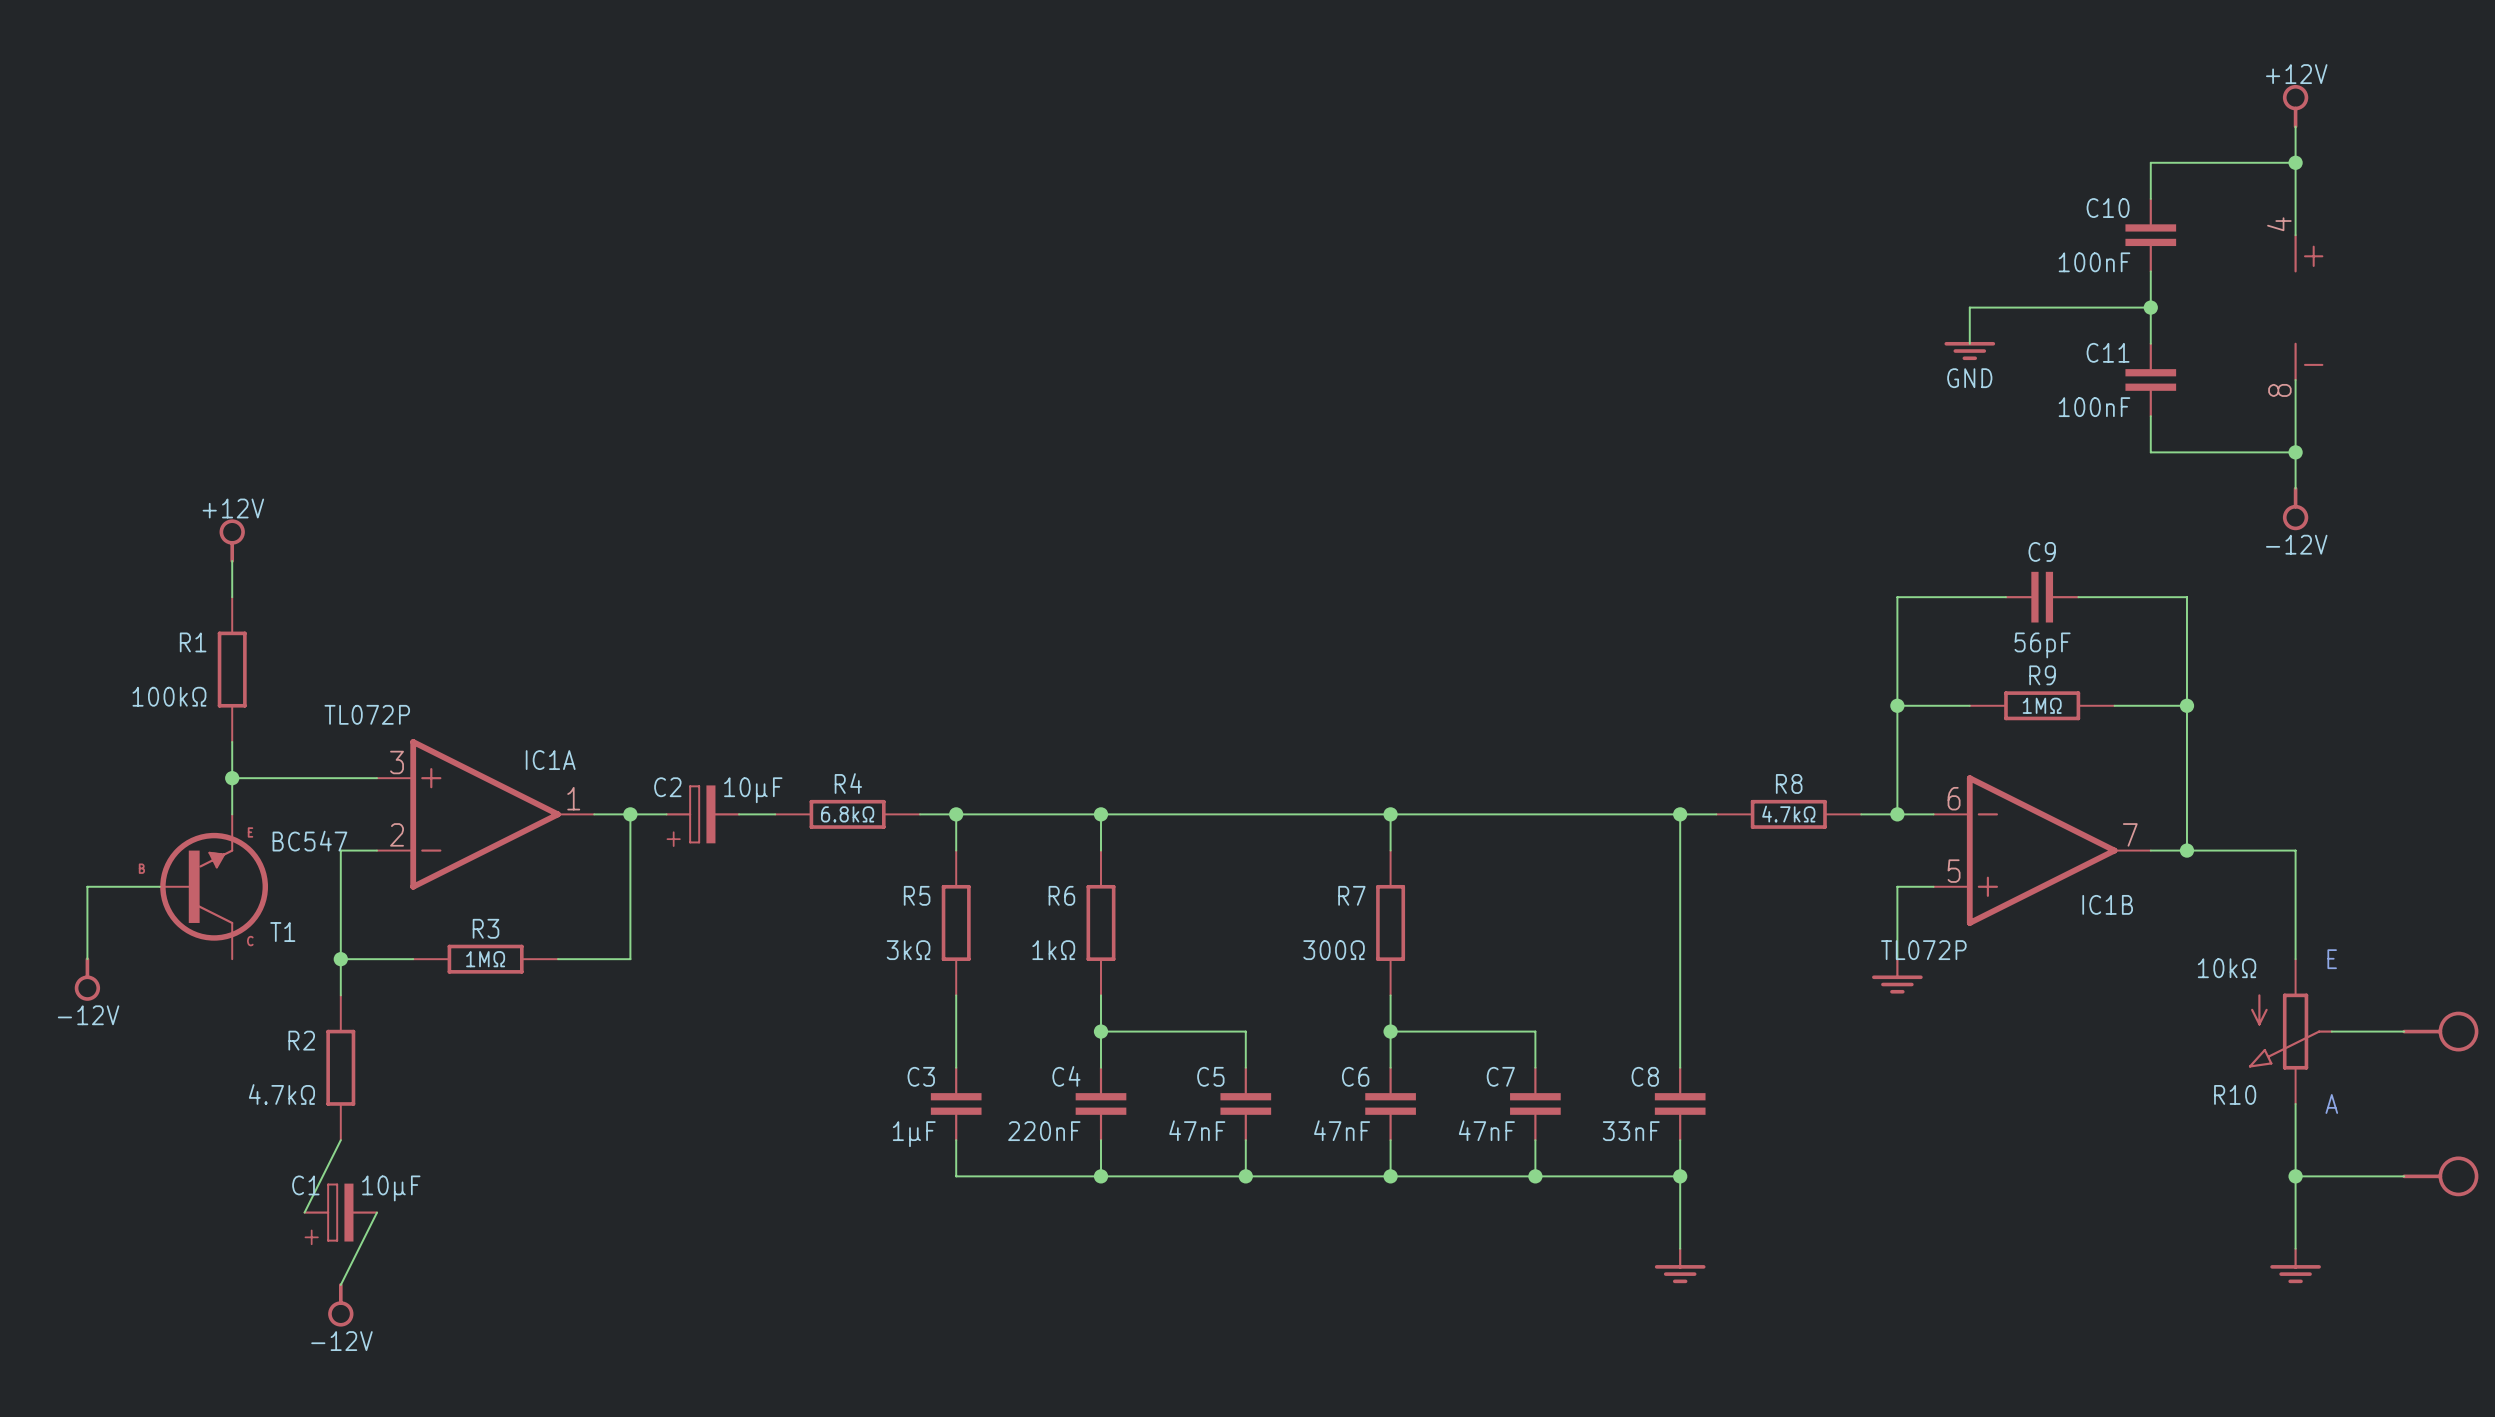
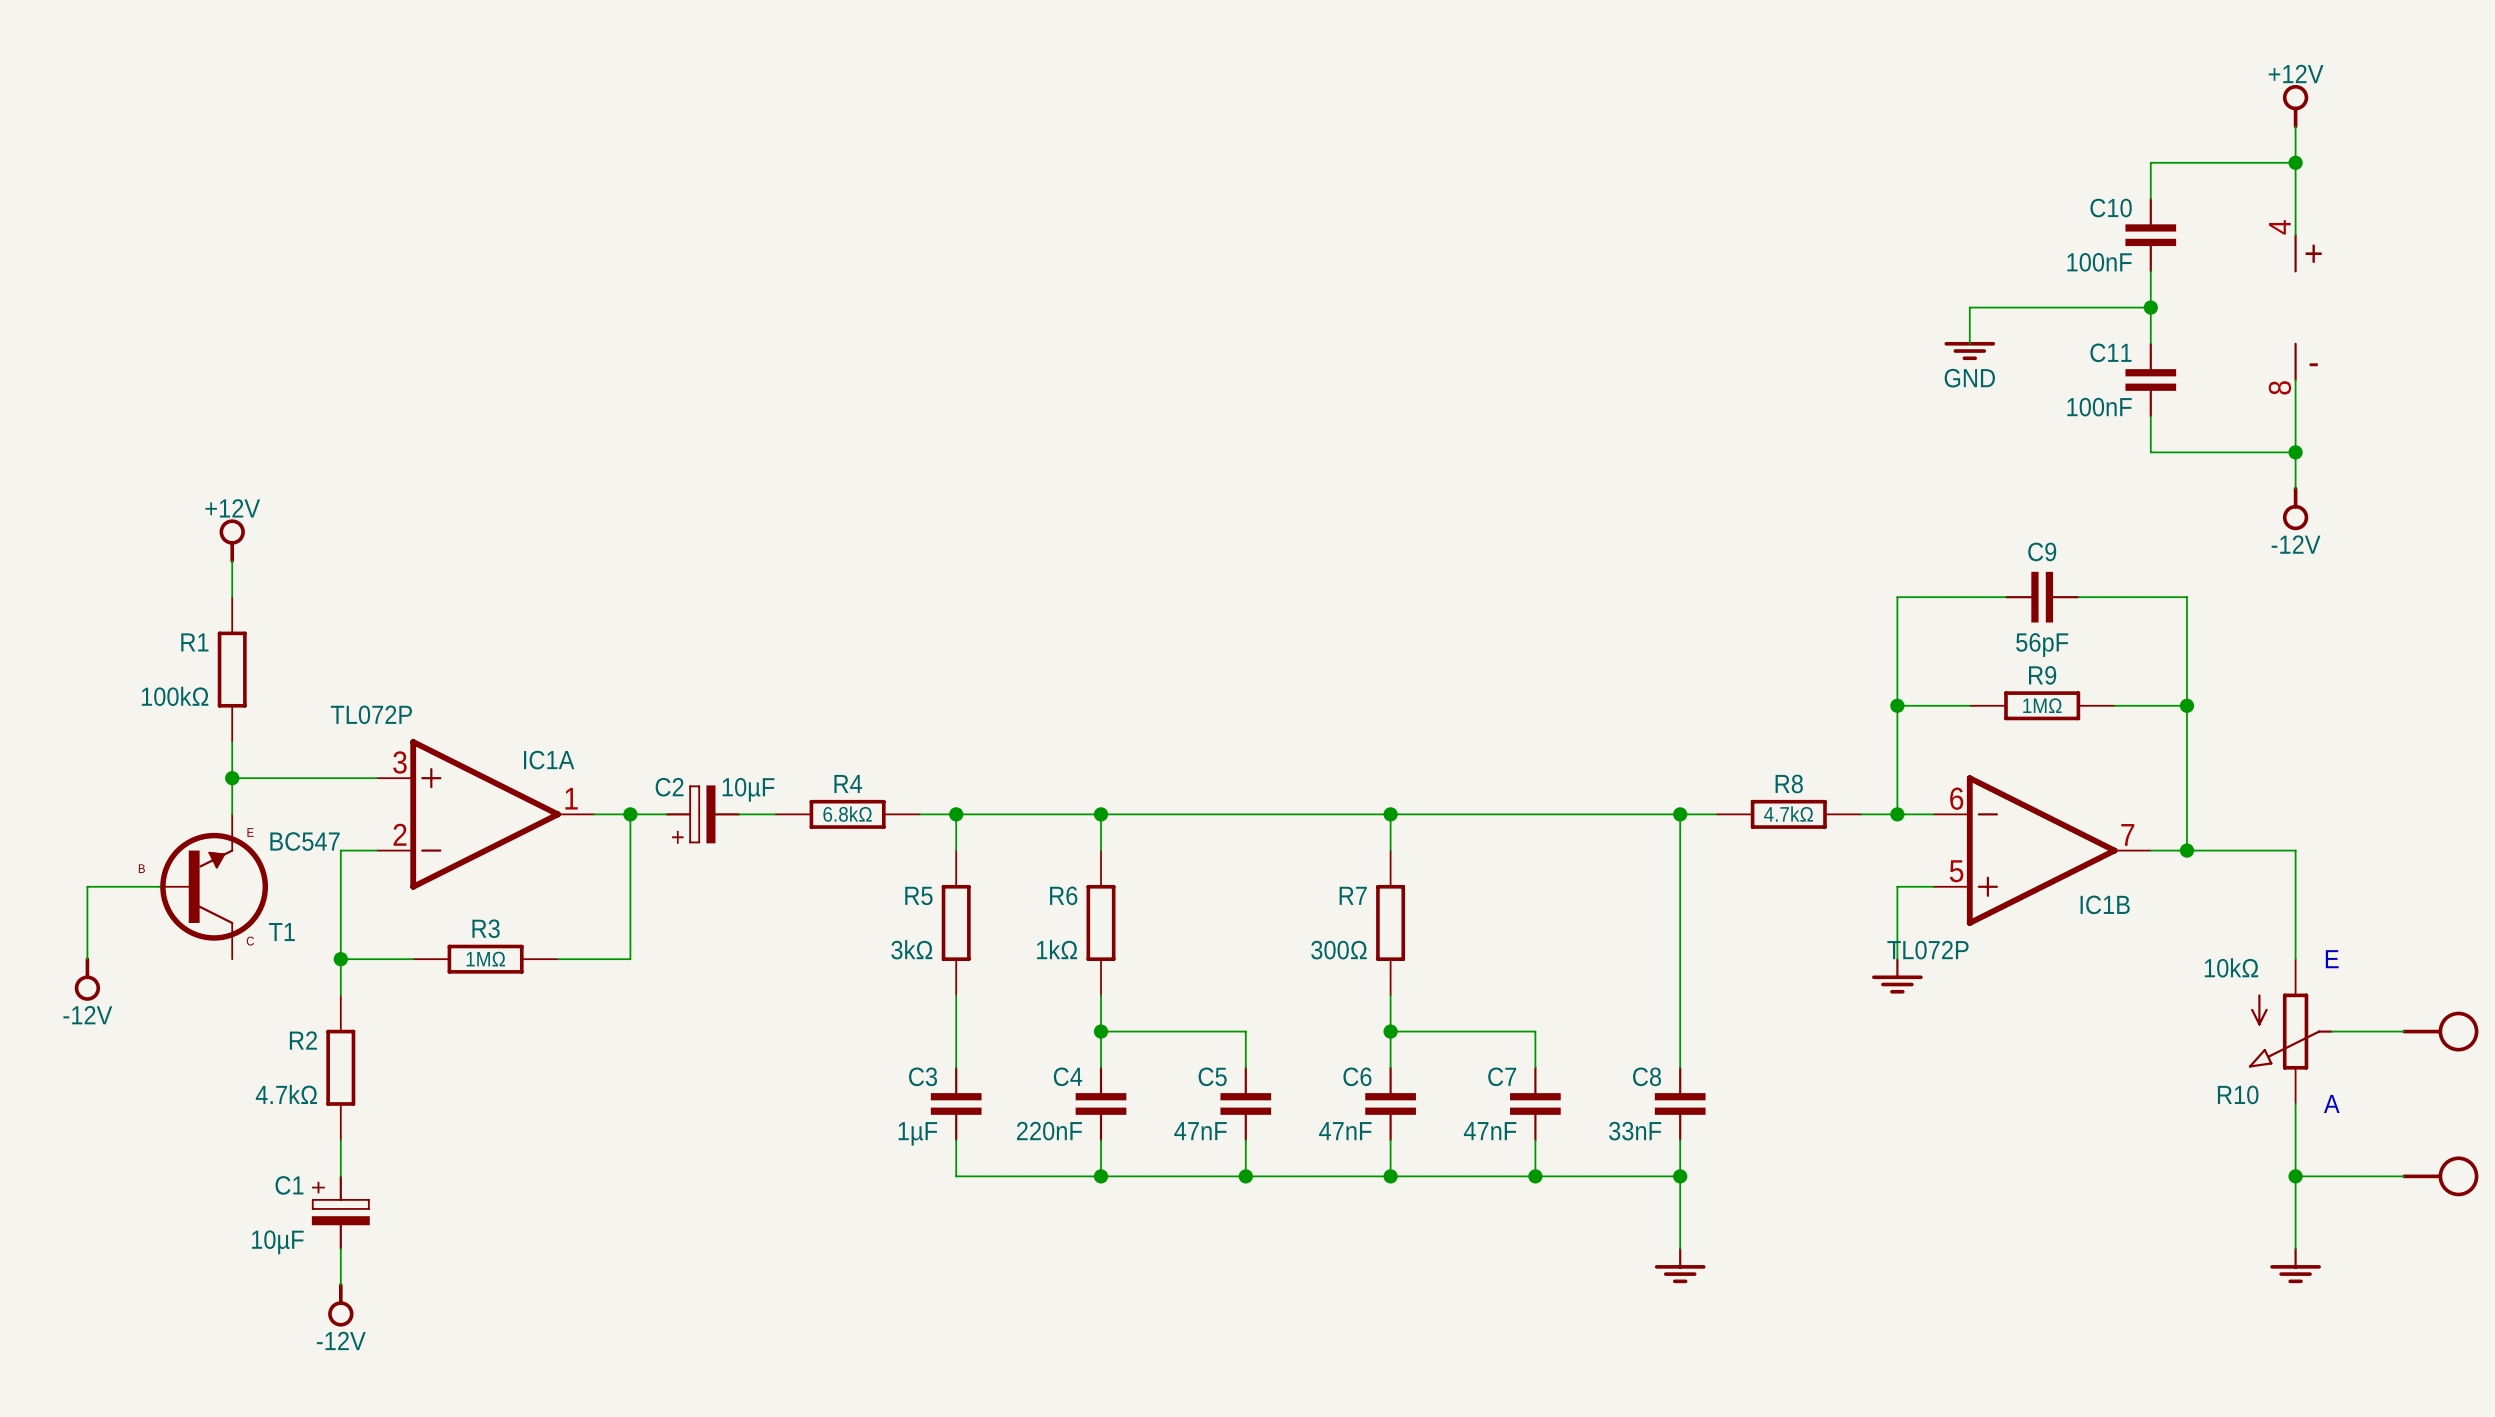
wire: (340, 1140) (304, 1212) -> (340, 1140) (340, 1176)
C1 symbol: [303, 1183, 379, 1242] -> [311, 1175, 370, 1250]
C1 value position: 10µF (391, 1188) -> 10µF (277, 1242)
wire: (377, 1212) (340, 1284) -> (340, 1248) (340, 1284)

